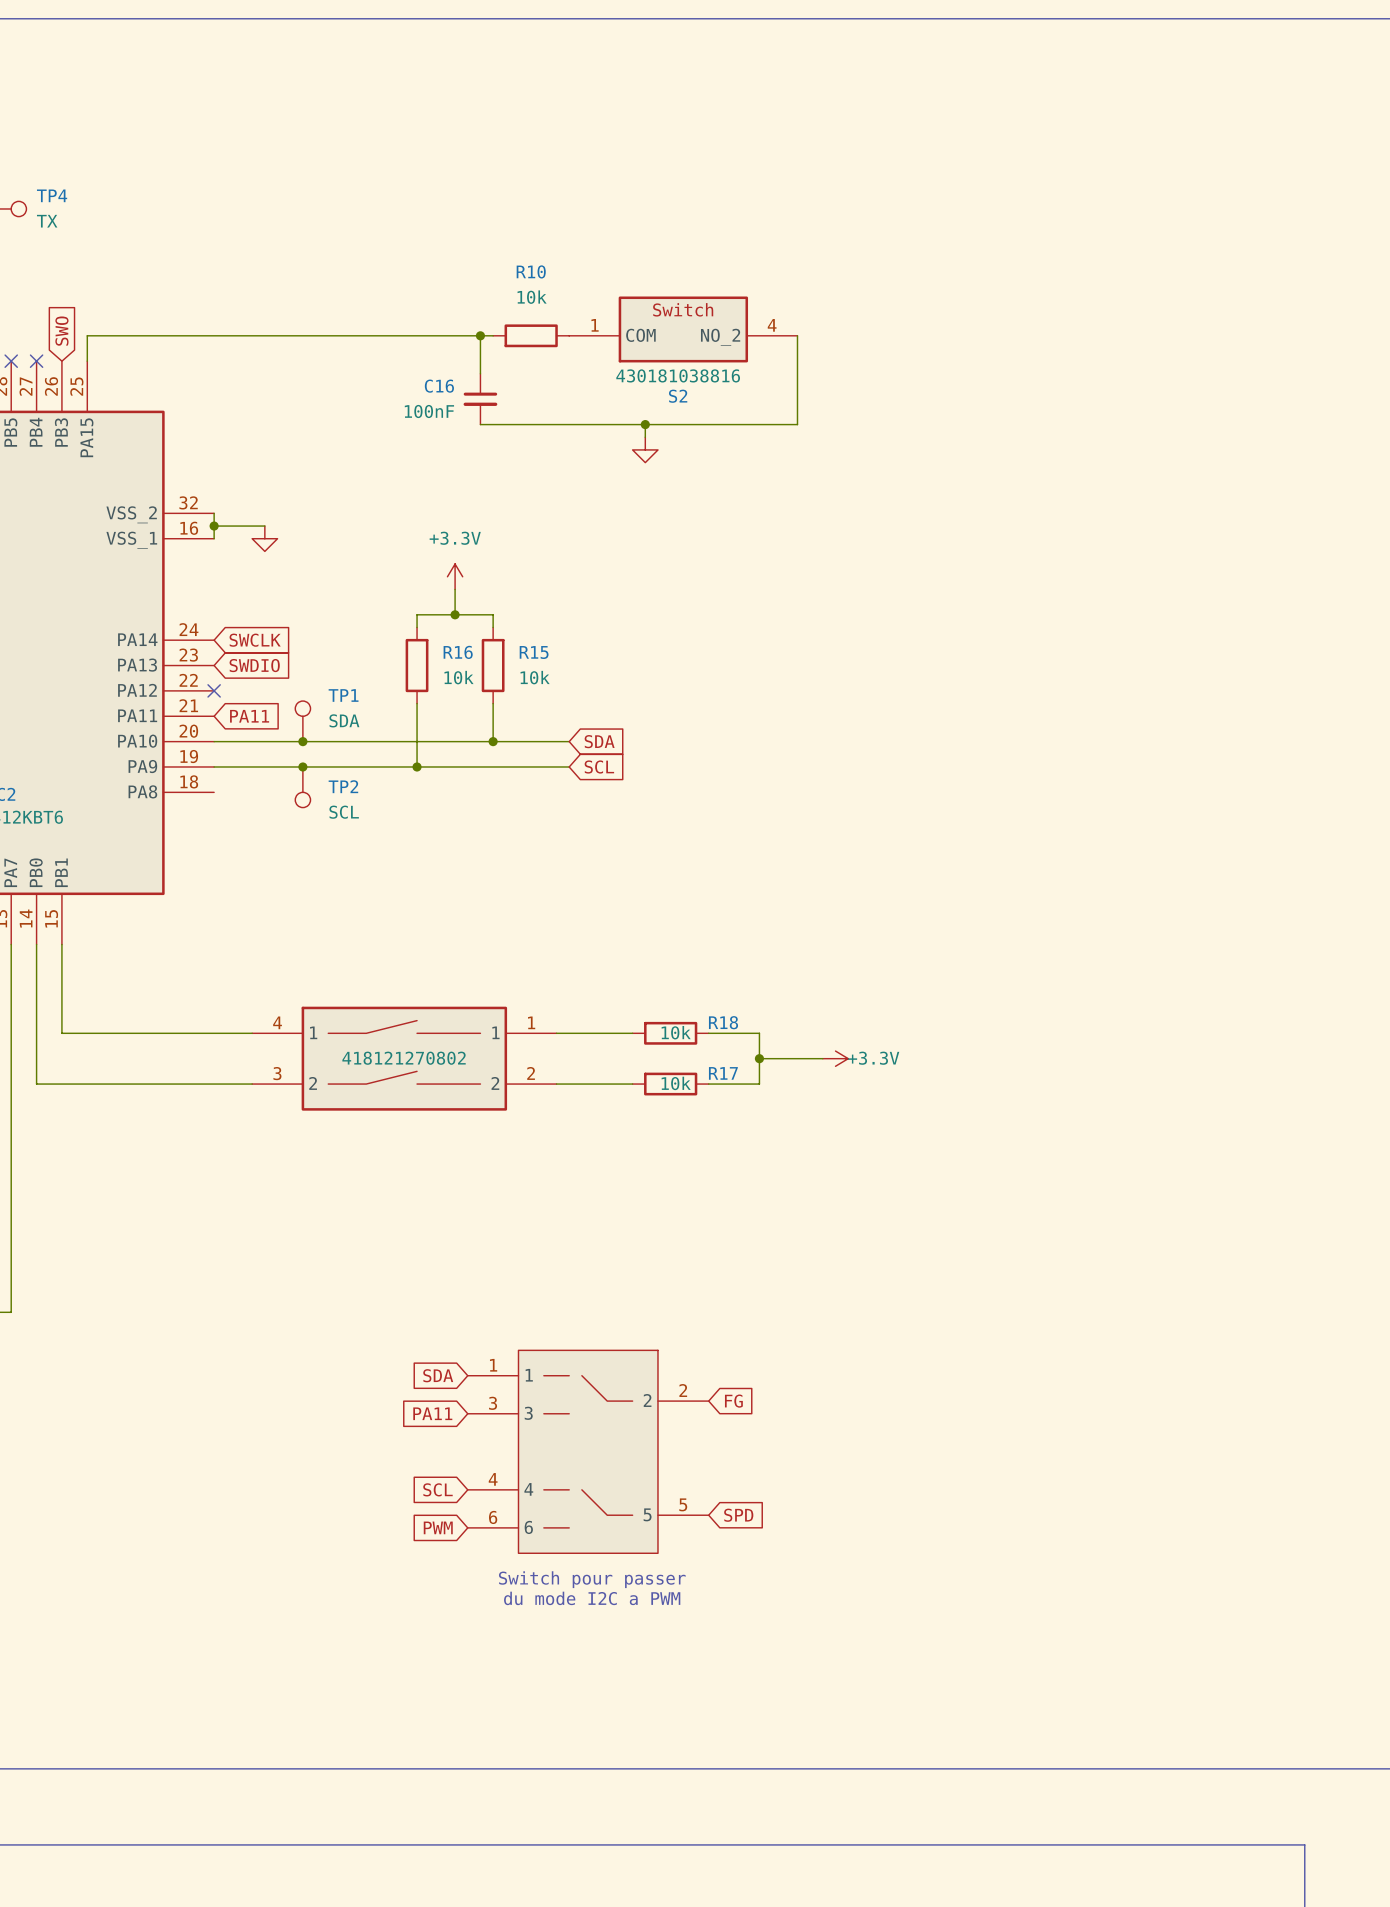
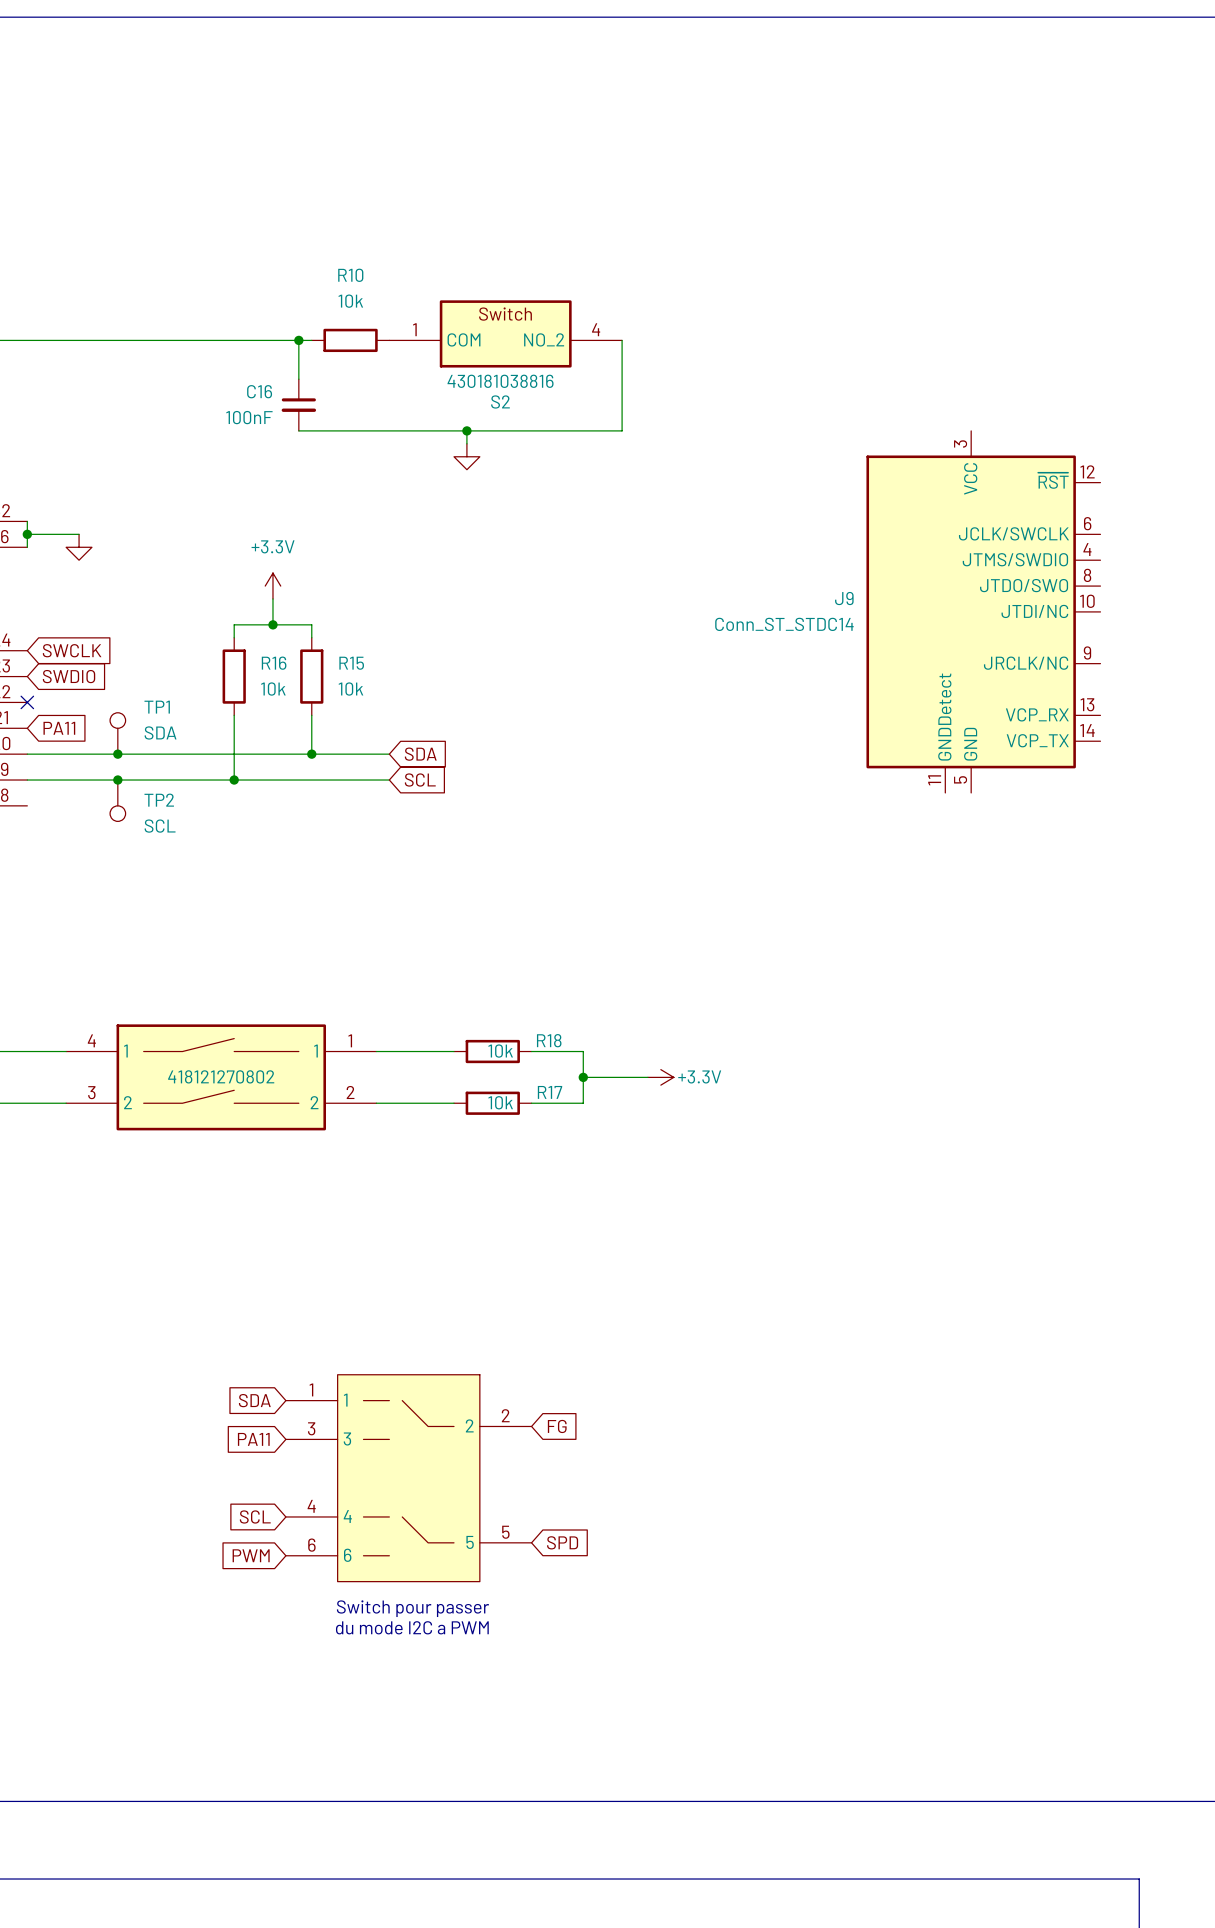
J9: none -> Conn_ST_STDC14 (983, 611)

